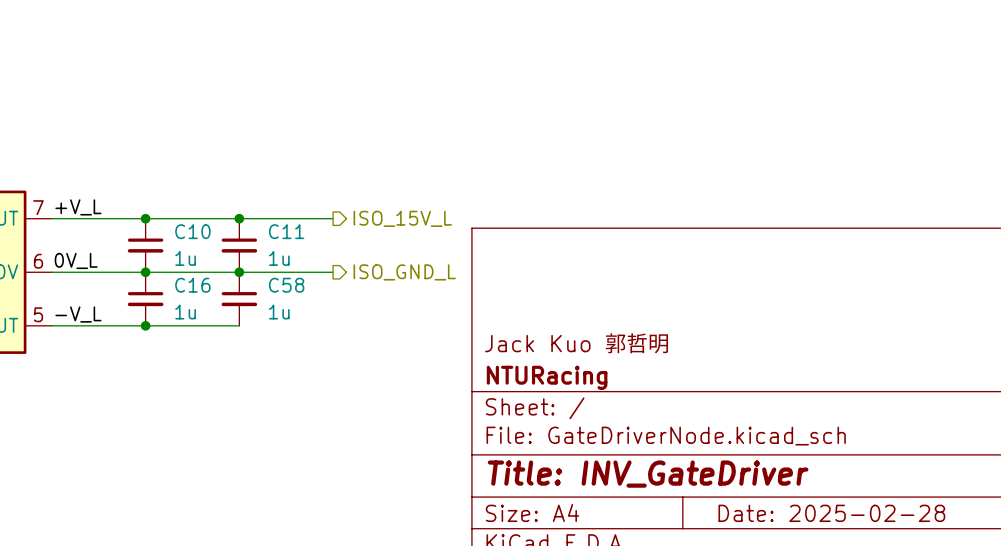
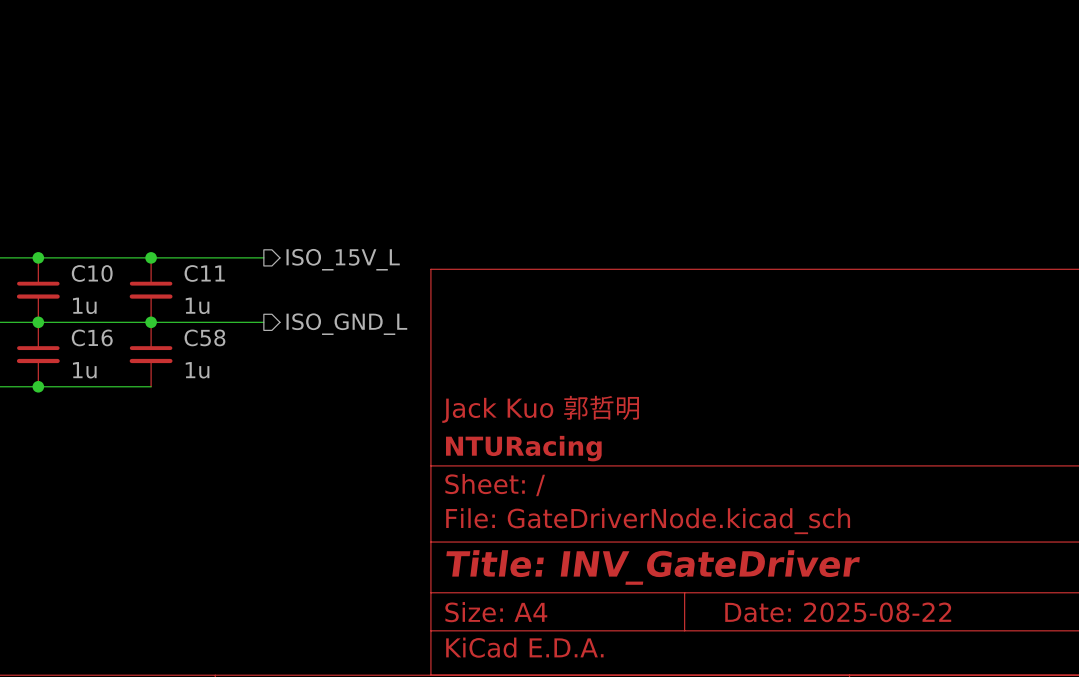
title block: Date: 2025-02-28 (831, 513) -> Date: 2025-08-22 (838, 612)

